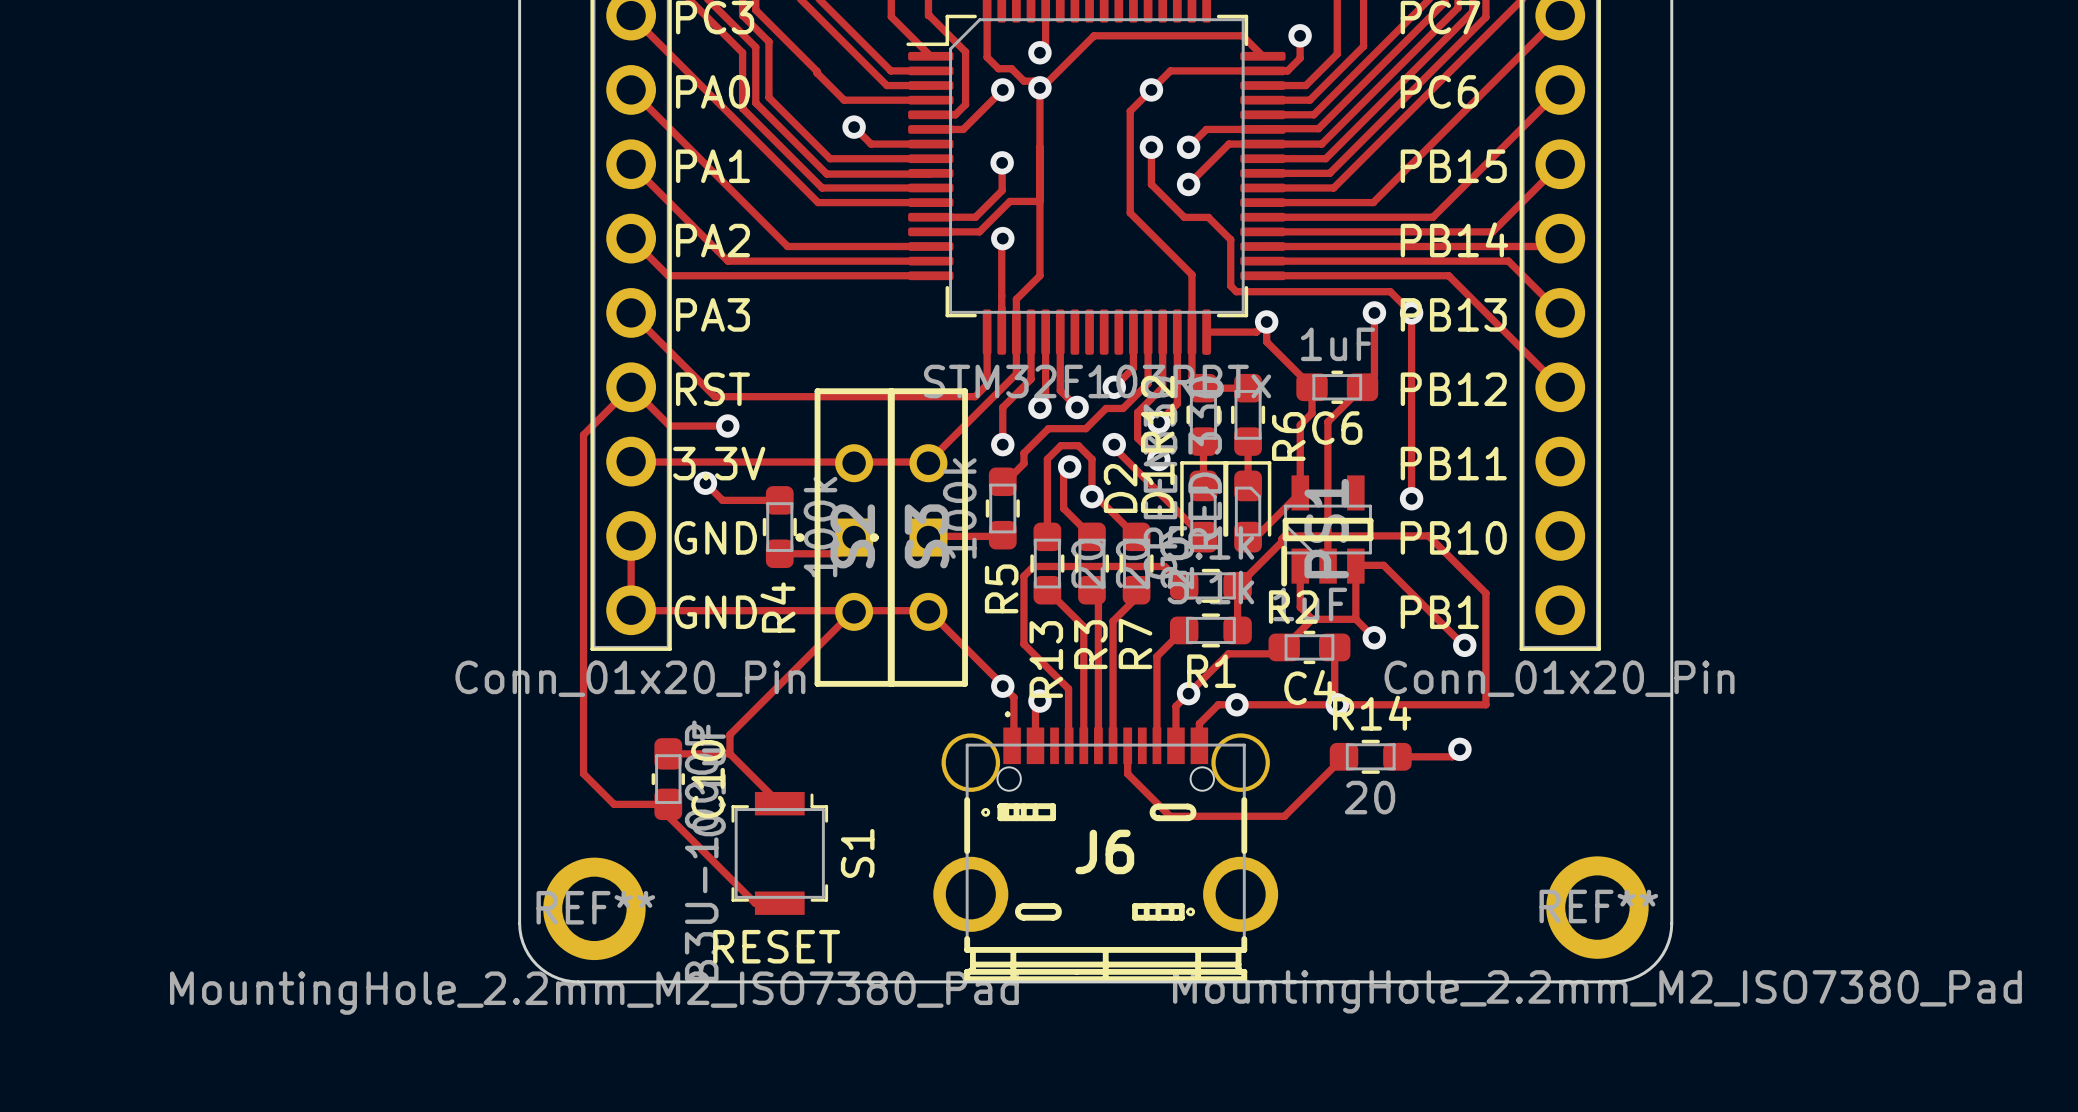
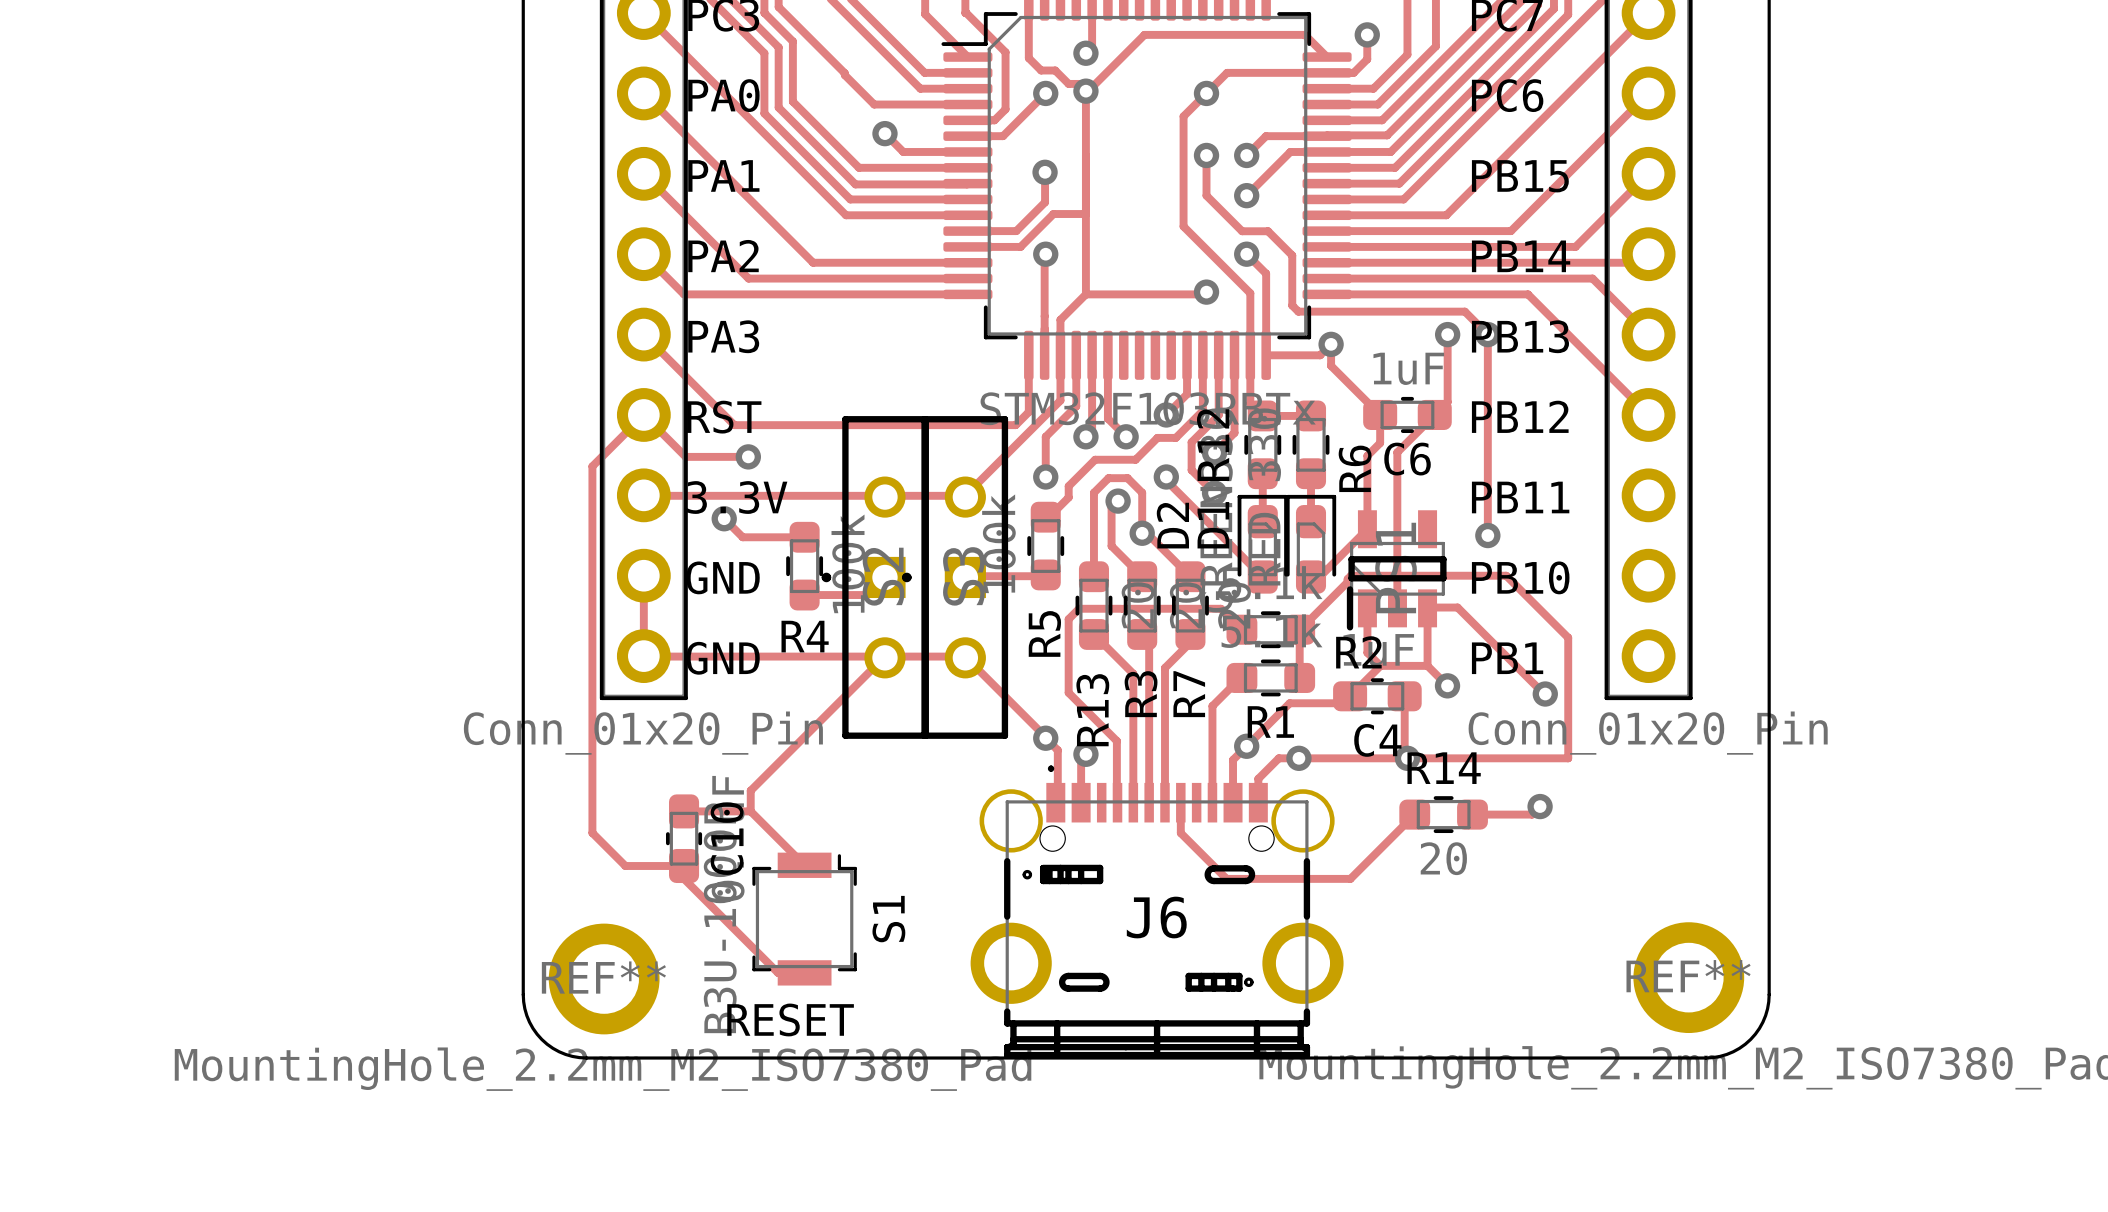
track: none -> (1246, 254) (1266, 273) (1266, 355)
via: none -> (1246, 254)
track: none -> (1206, 292) (1204, 294) (1085, 294)
via: none -> (1206, 292)
R4 name rotation: 0° (777, 607) -> 90° clockwise (805, 636)

